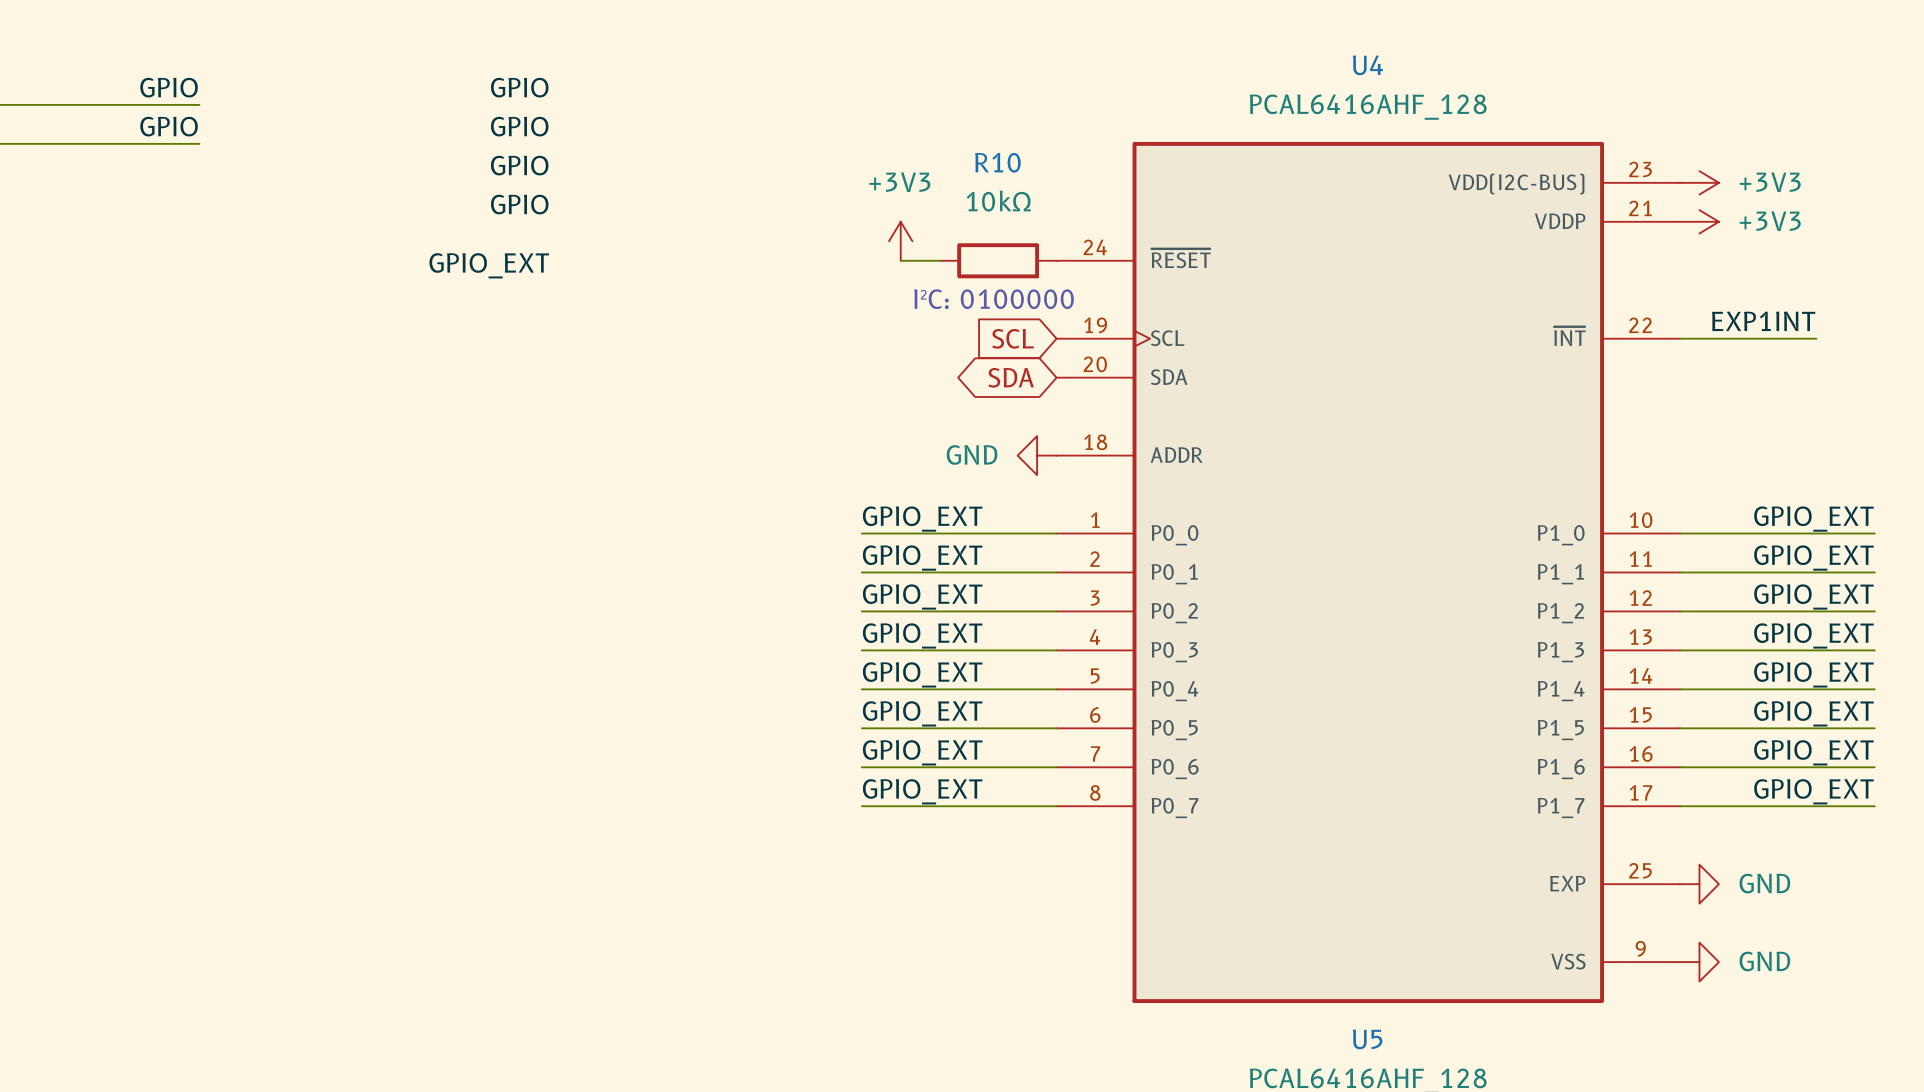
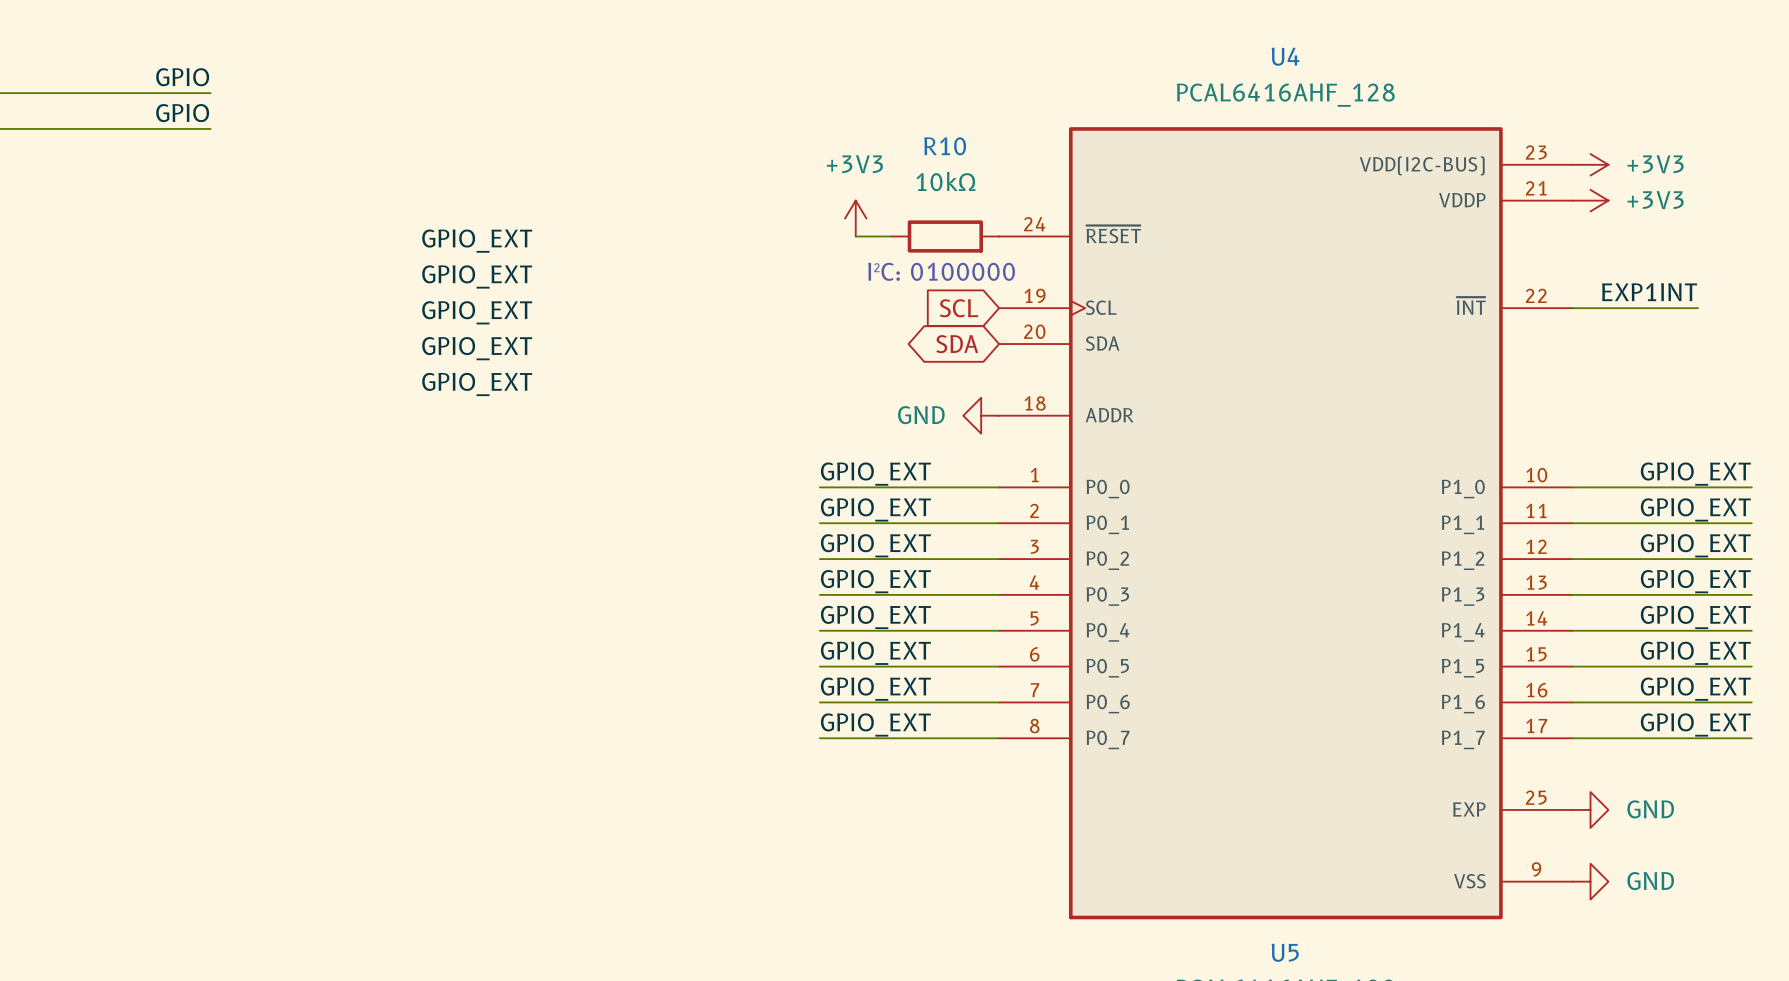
label: GPIO (519, 87) -> none
label: GPIO (519, 126) -> none
label: GPIO (519, 165) -> none
label: GPIO (519, 204) -> none
label: none -> GPIO_EXT (477, 276)
label: none -> GPIO_EXT (477, 312)
label: none -> GPIO_EXT (477, 348)
label: none -> GPIO_EXT (477, 384)

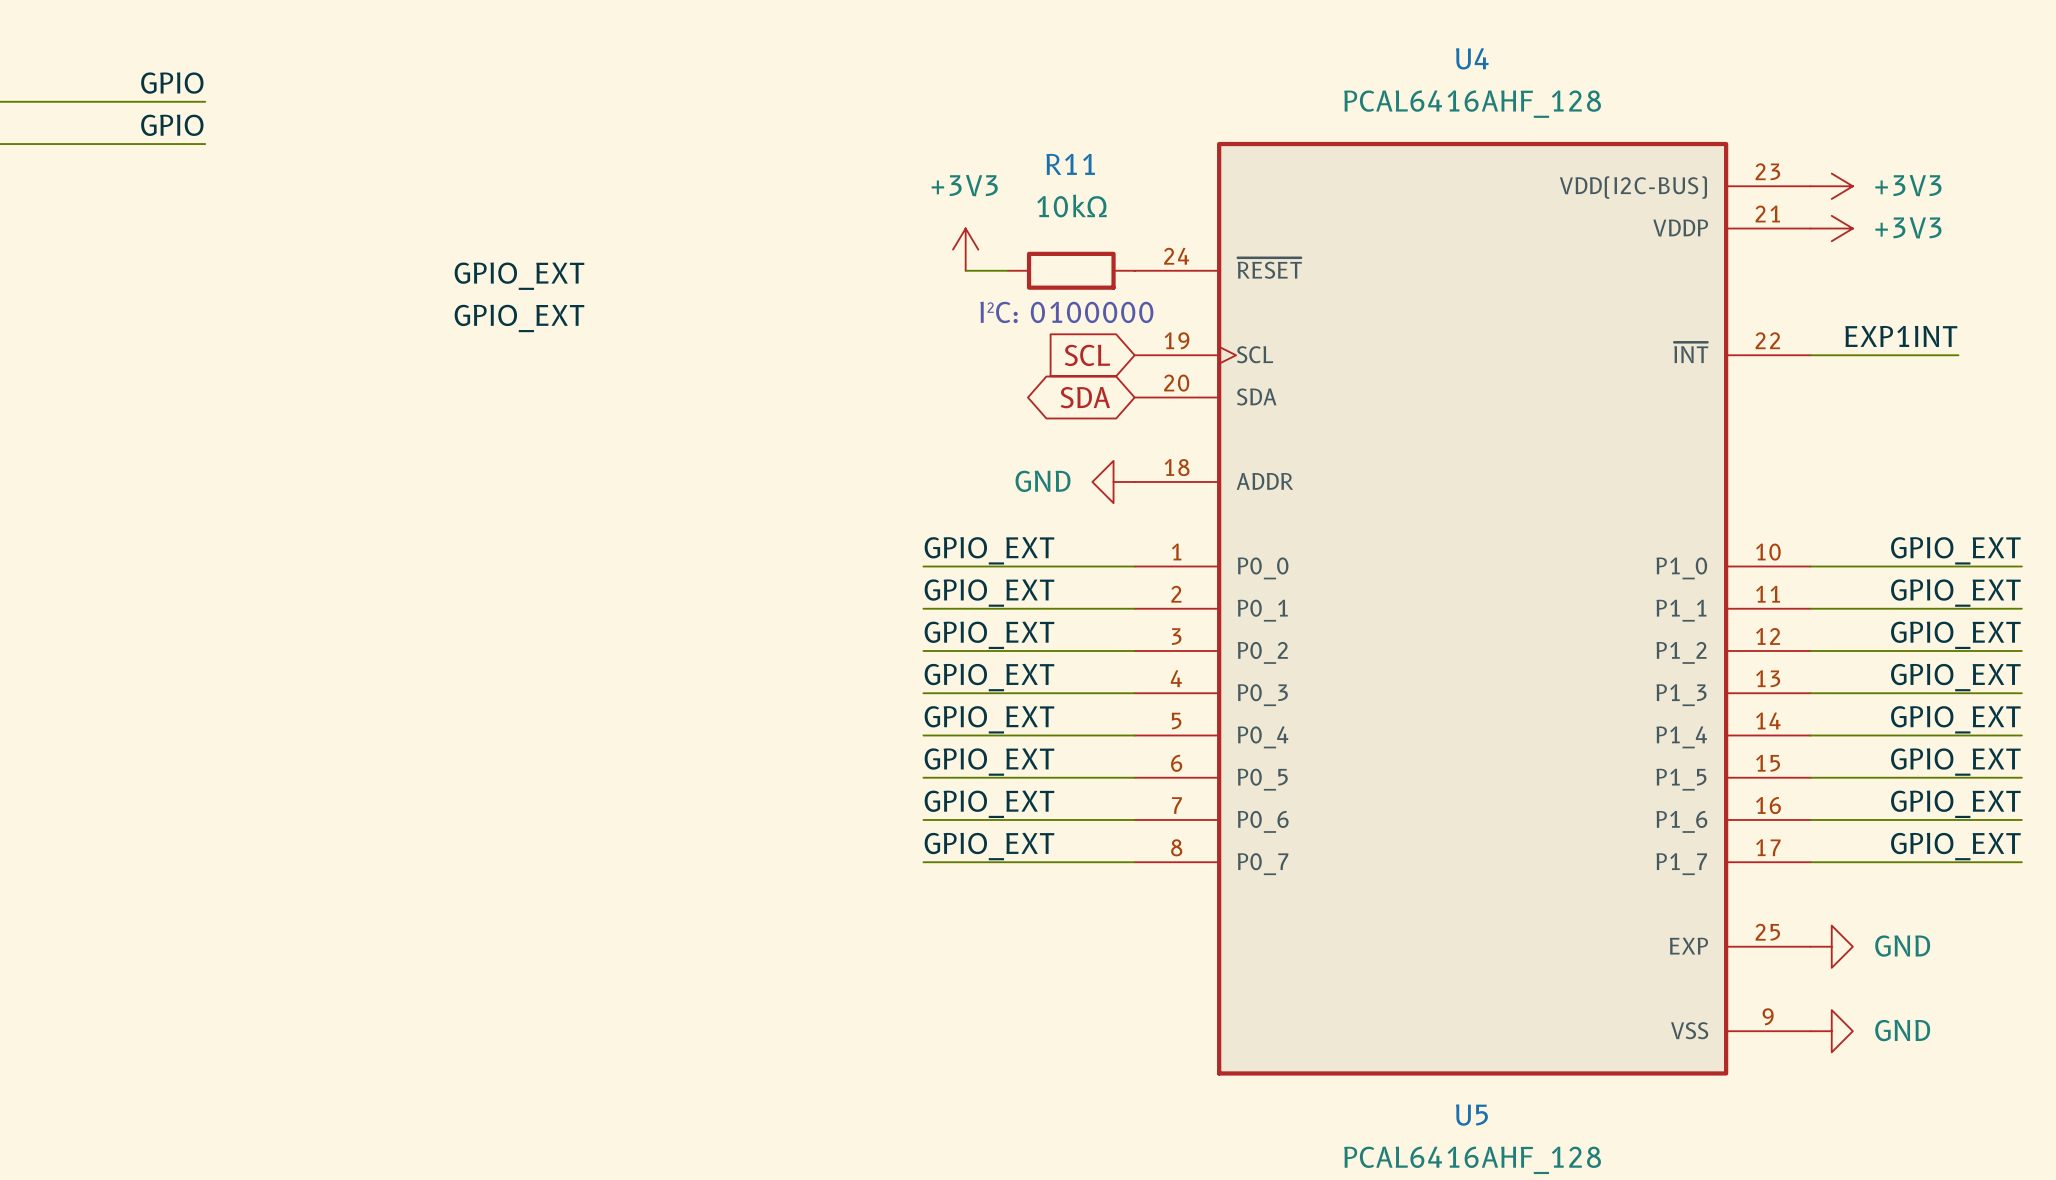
R10 name: R10 (945, 146) -> R11 (1070, 164)
label: GPIO_EXT (477, 312) -> none
label: GPIO_EXT (477, 348) -> none
label: GPIO_EXT (477, 384) -> none

